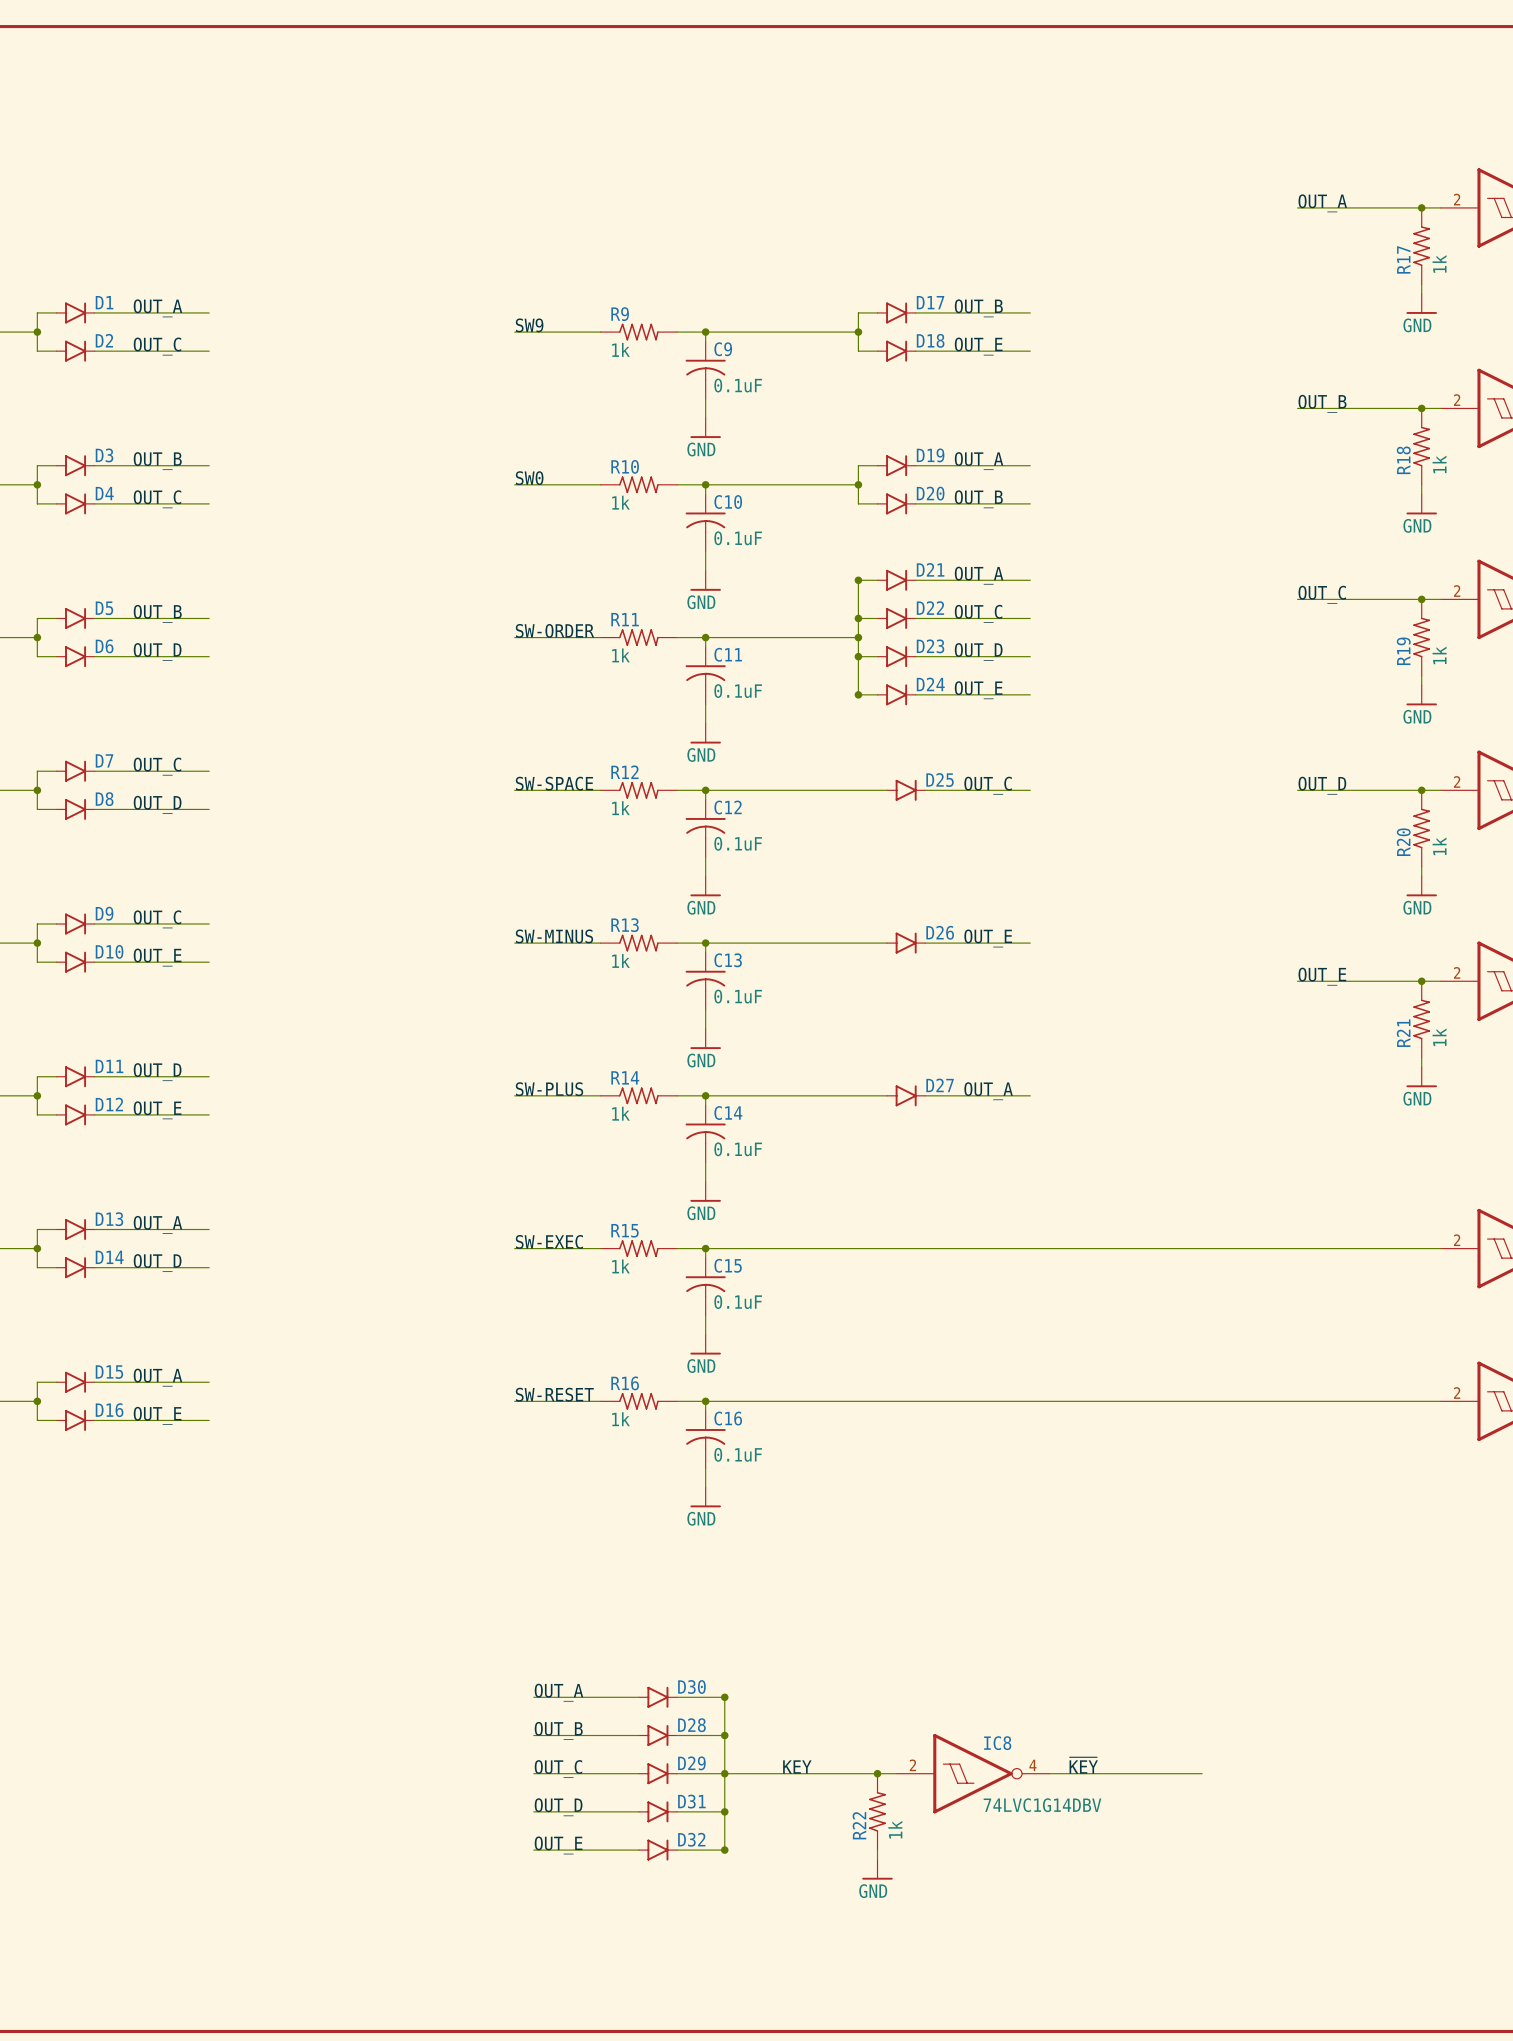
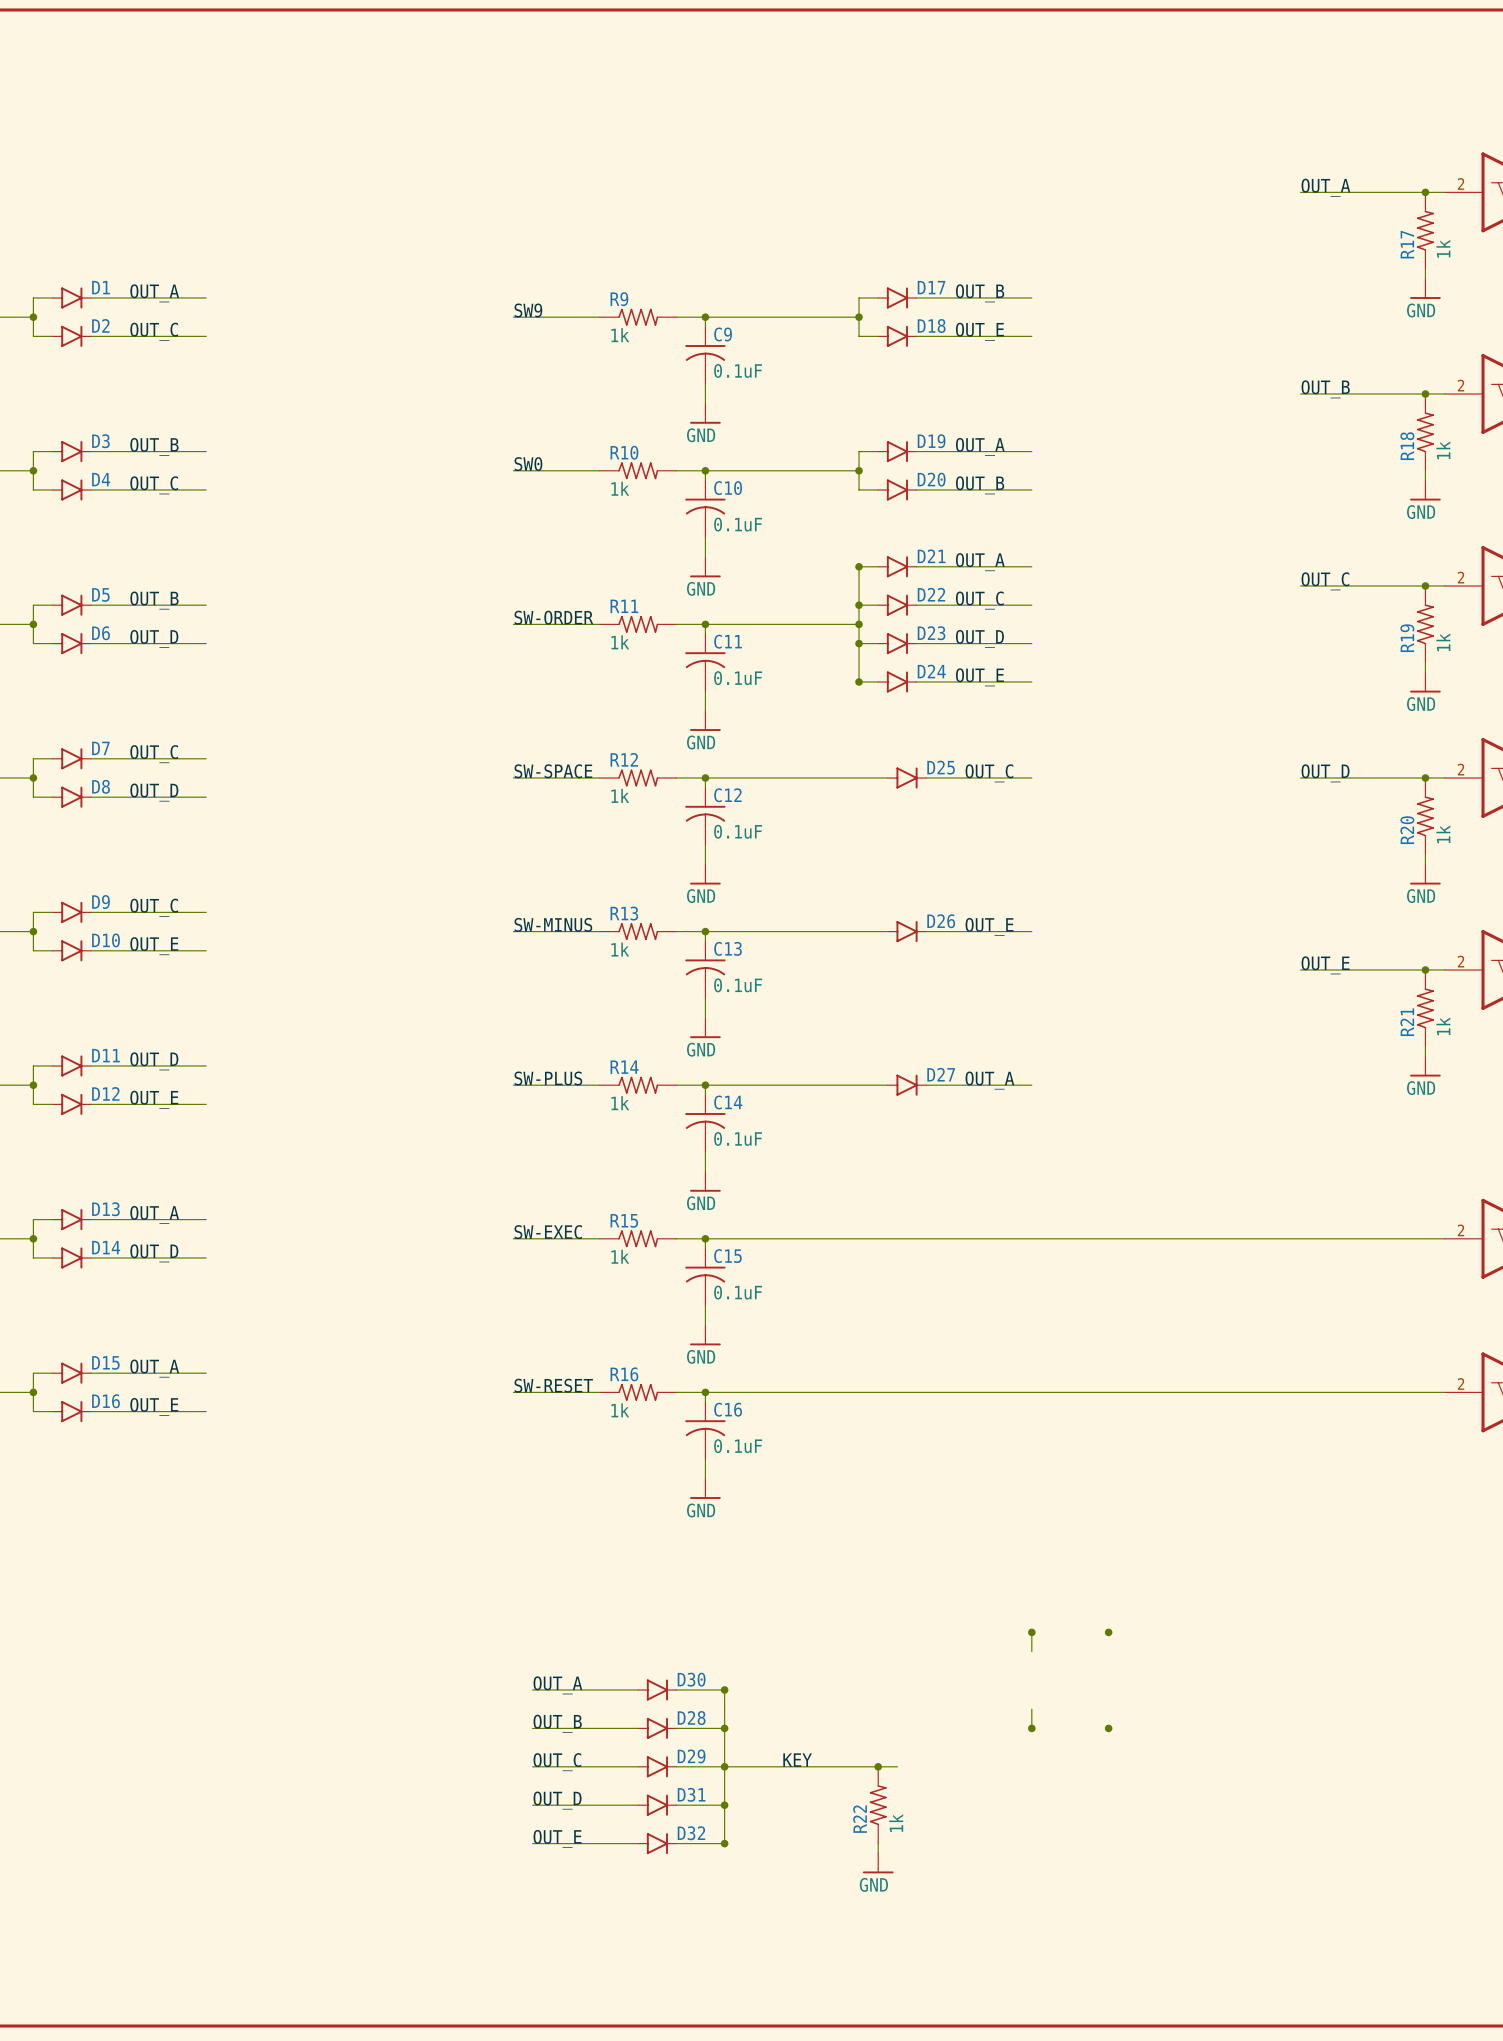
wire: none -> (1031, 1632) (1031, 1651)
junction: none -> (1031, 1632)
junction: none -> (1108, 1632)
wire: none -> (1031, 1709) (1031, 1728)
junction: none -> (1031, 1728)
junction: none -> (1108, 1728)
label: ~{KEY} (1083, 1765) -> none
IC8: 74LVC1G14DBV (972, 1773) -> none
wire: (1049, 1773) (1202, 1773) -> none

